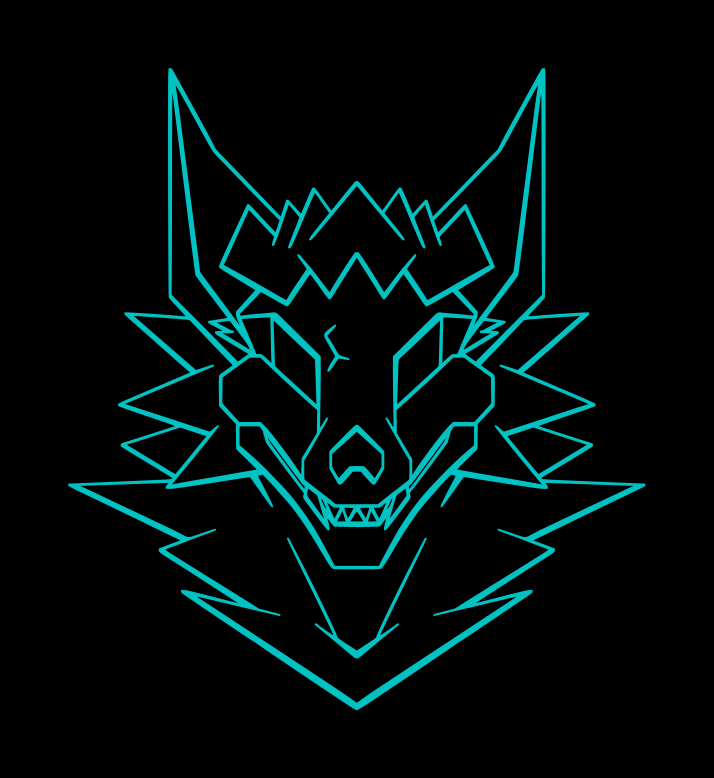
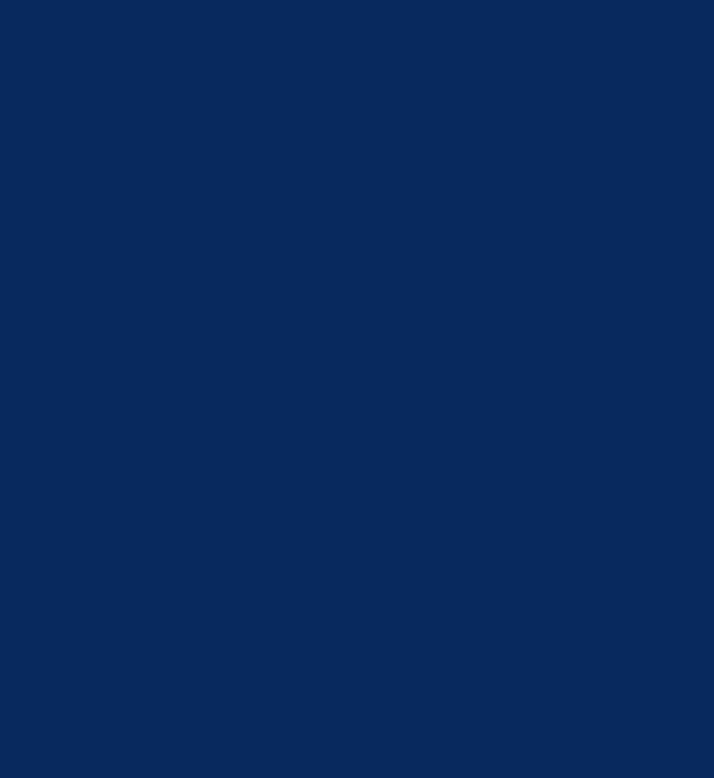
drawing: [68, 68, 646, 711] -> none

